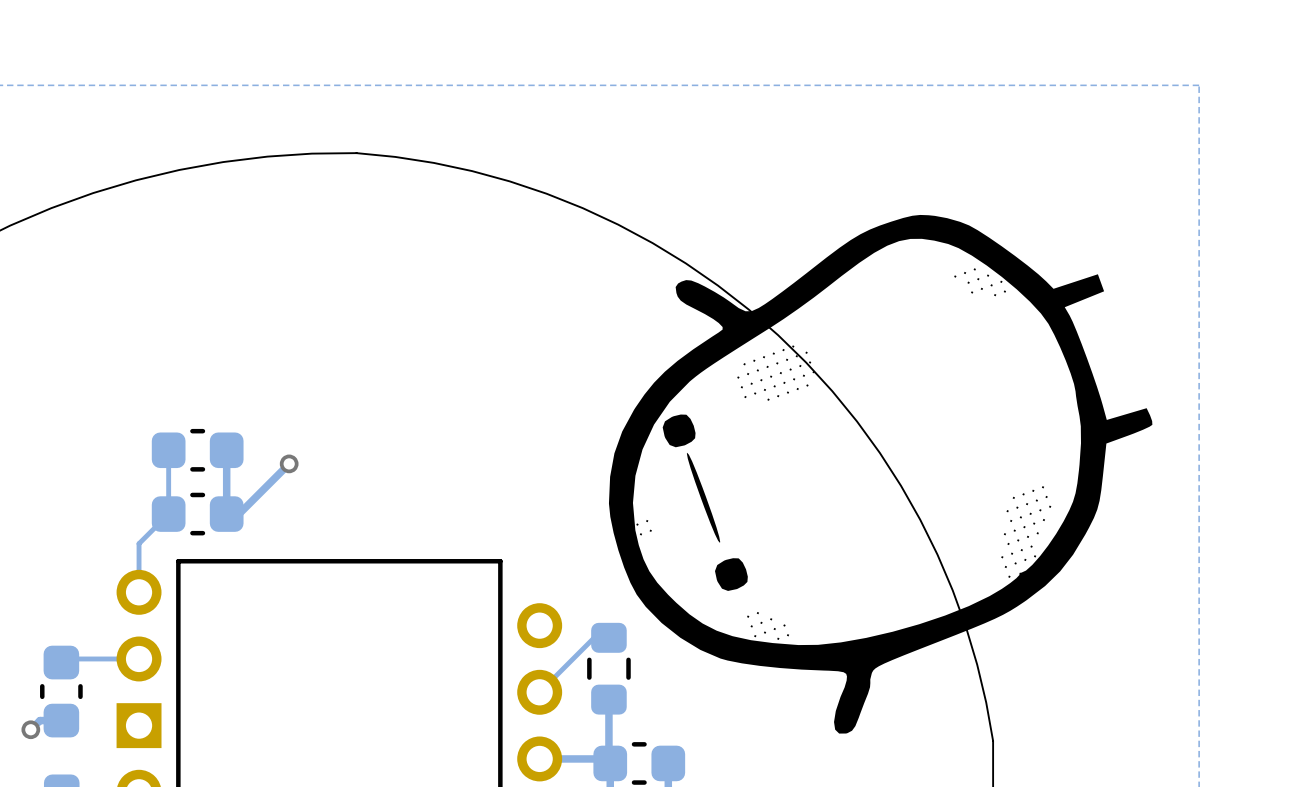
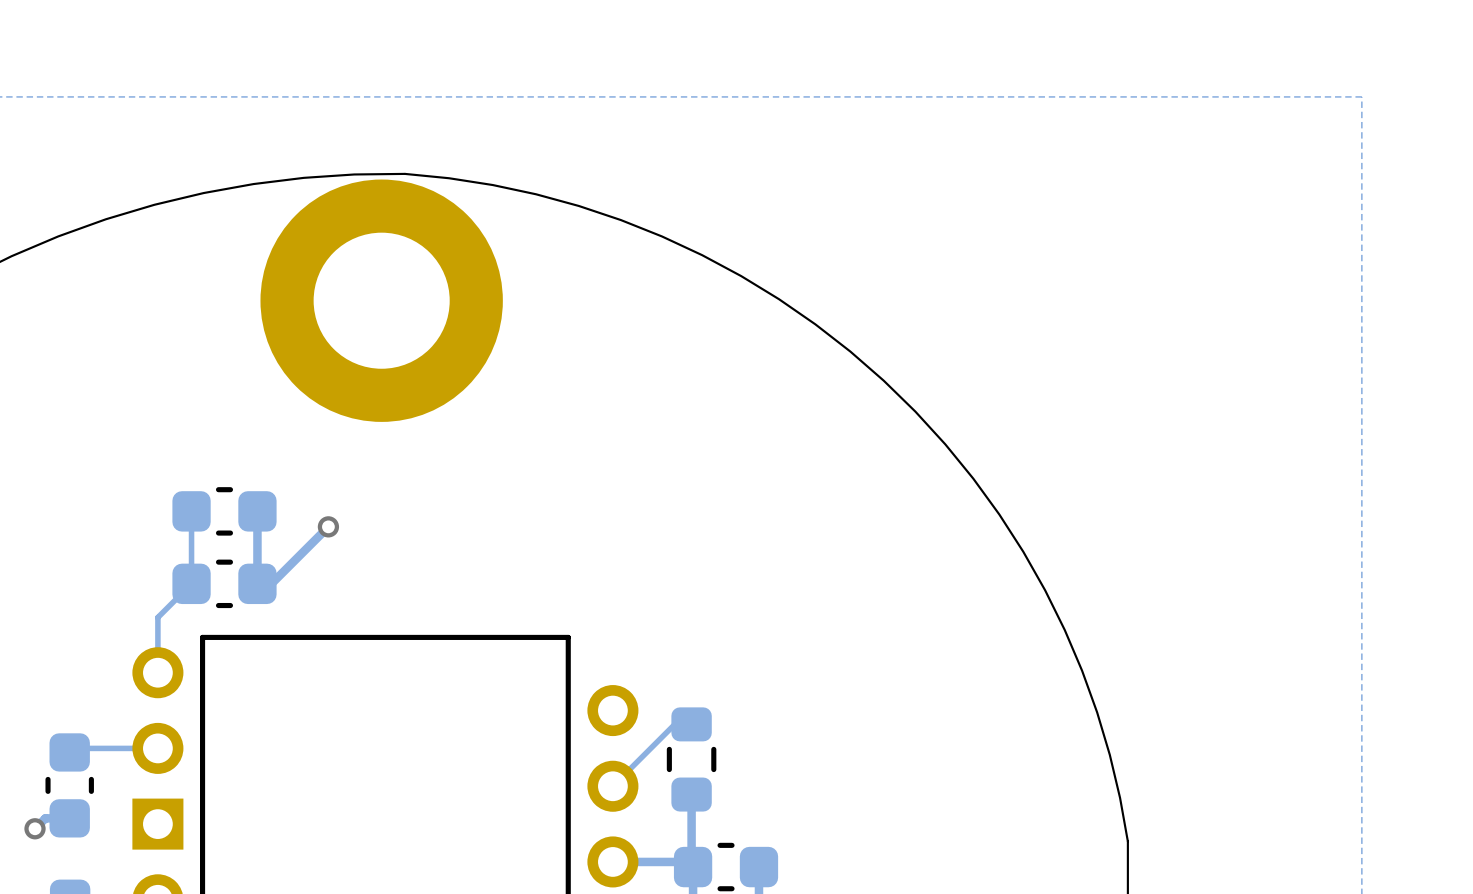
drawing: [608, 214, 1153, 734] -> none
part: none -> (381, 300)

